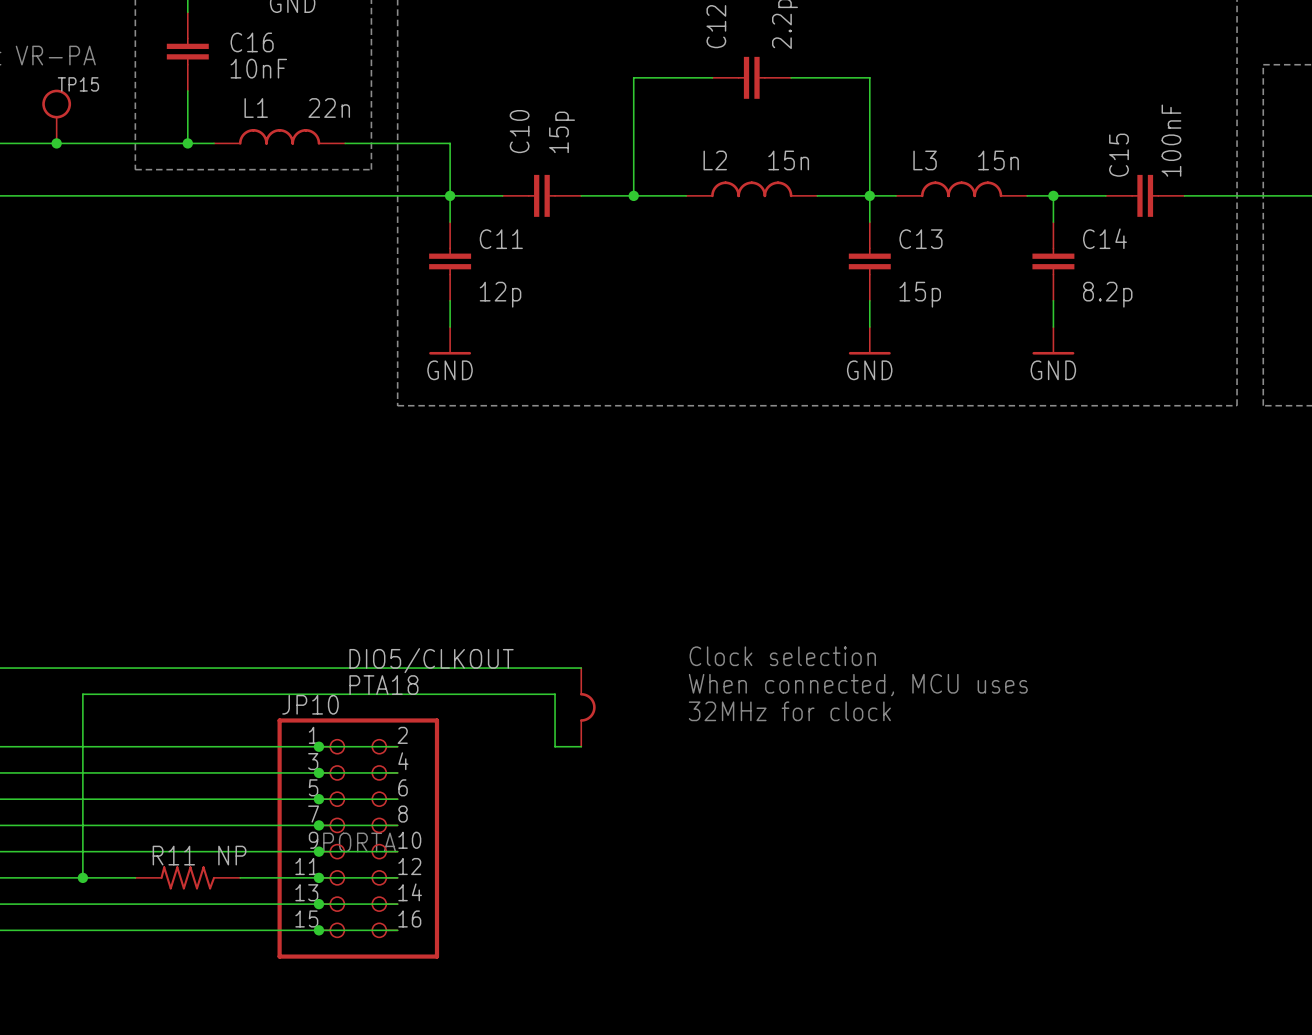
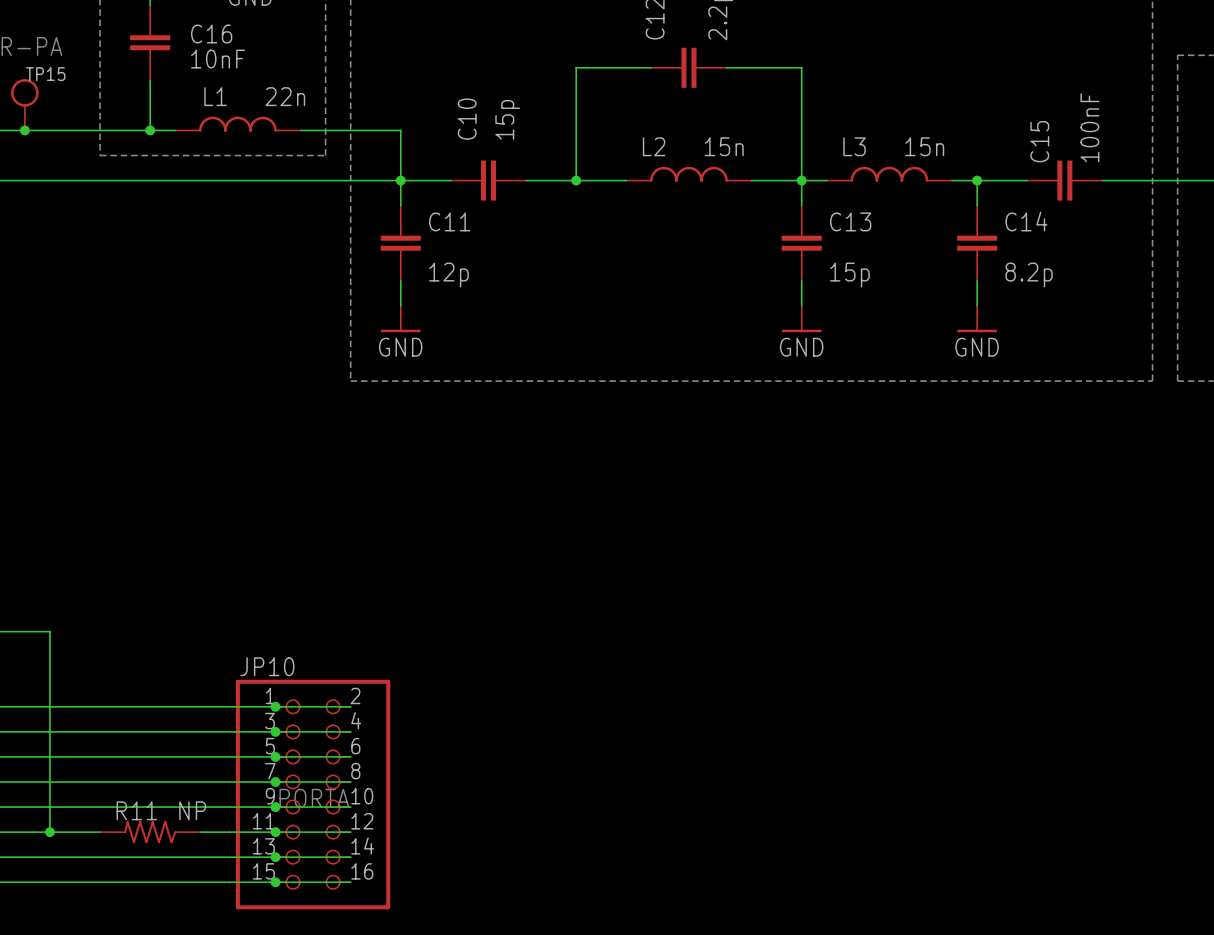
text: Clock selection (782, 656) -> none
label: DIO5/CLKOUT (431, 660) -> none
wire: (82, 668) (581, 668) -> (49, 631) (49, 656)
label: PTA18 (383, 685) -> none
text: When connected, MCU uses (858, 685) -> none
wire: (82, 694) (555, 694) (555, 746) (581, 746) -> none
part: (587, 707) -> none
text: 32MHz for clock (789, 711) -> none

